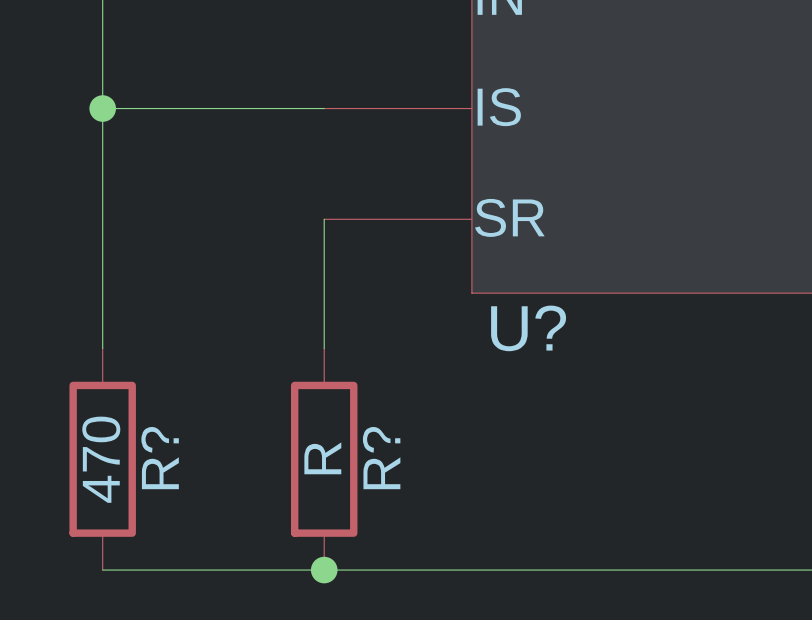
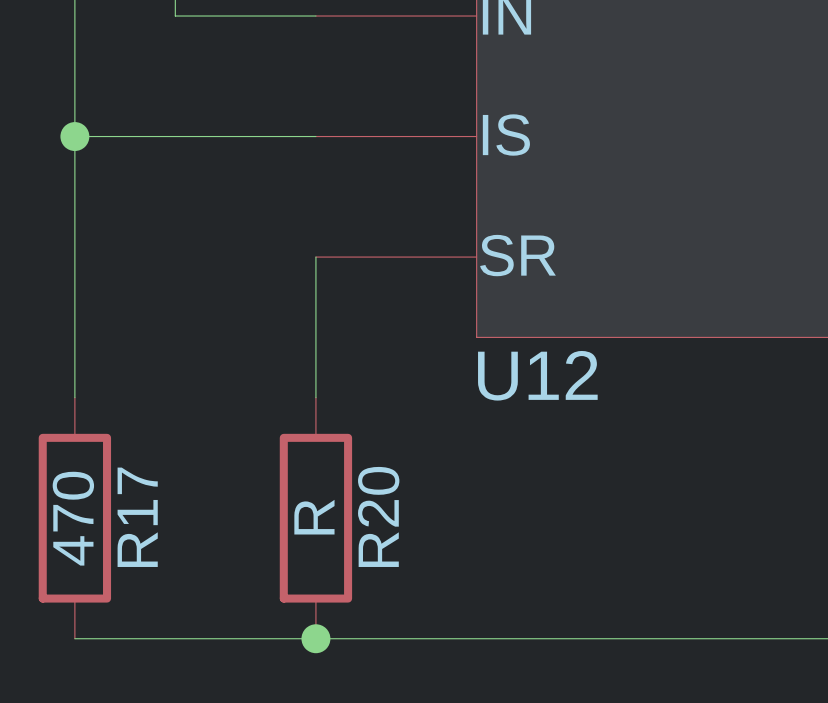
U? name: U? (528, 328) -> U12 (537, 375)
R? name: R? (160, 458) -> R17 (137, 517)
R? name: R? (381, 458) -> R20 (378, 516)

